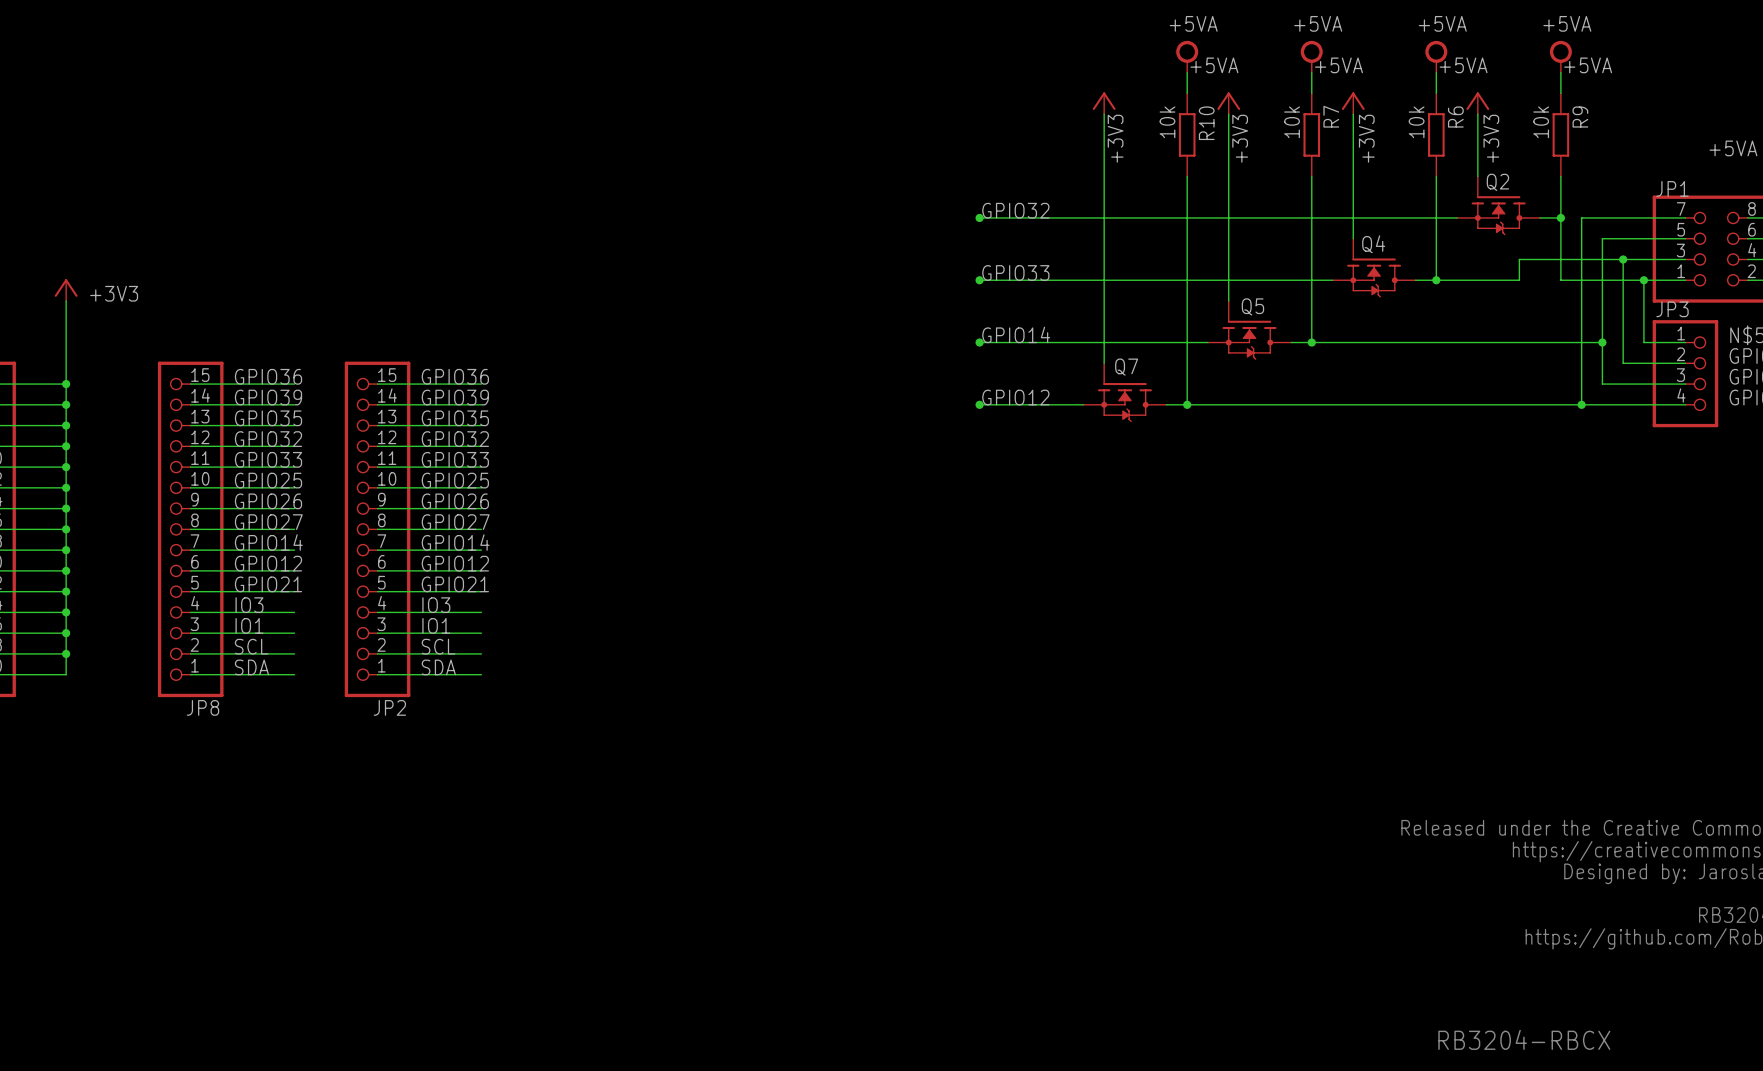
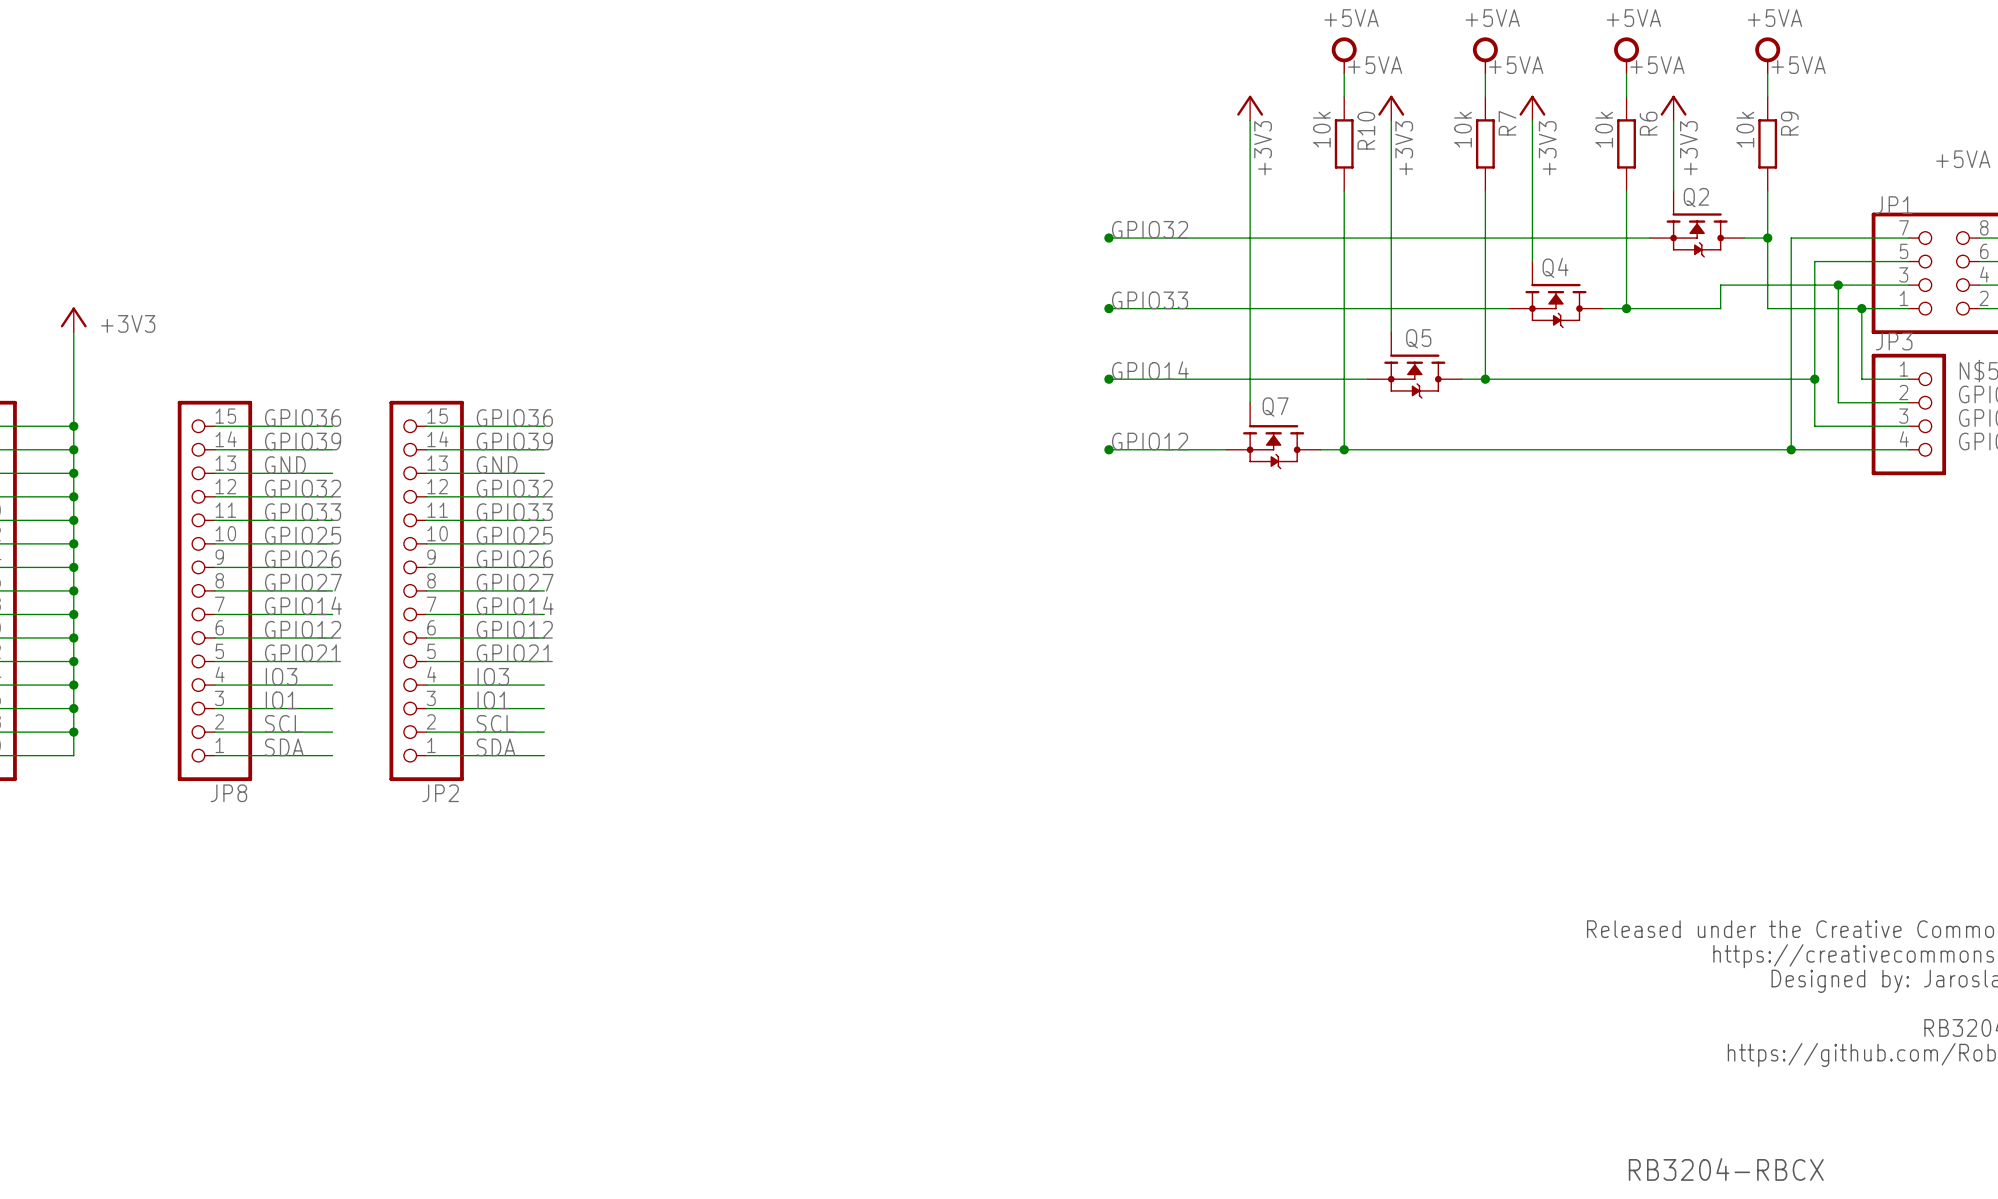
label: GPIO35 (268, 418) -> GND (285, 465)
label: GPIO35 (455, 418) -> GND (497, 465)

